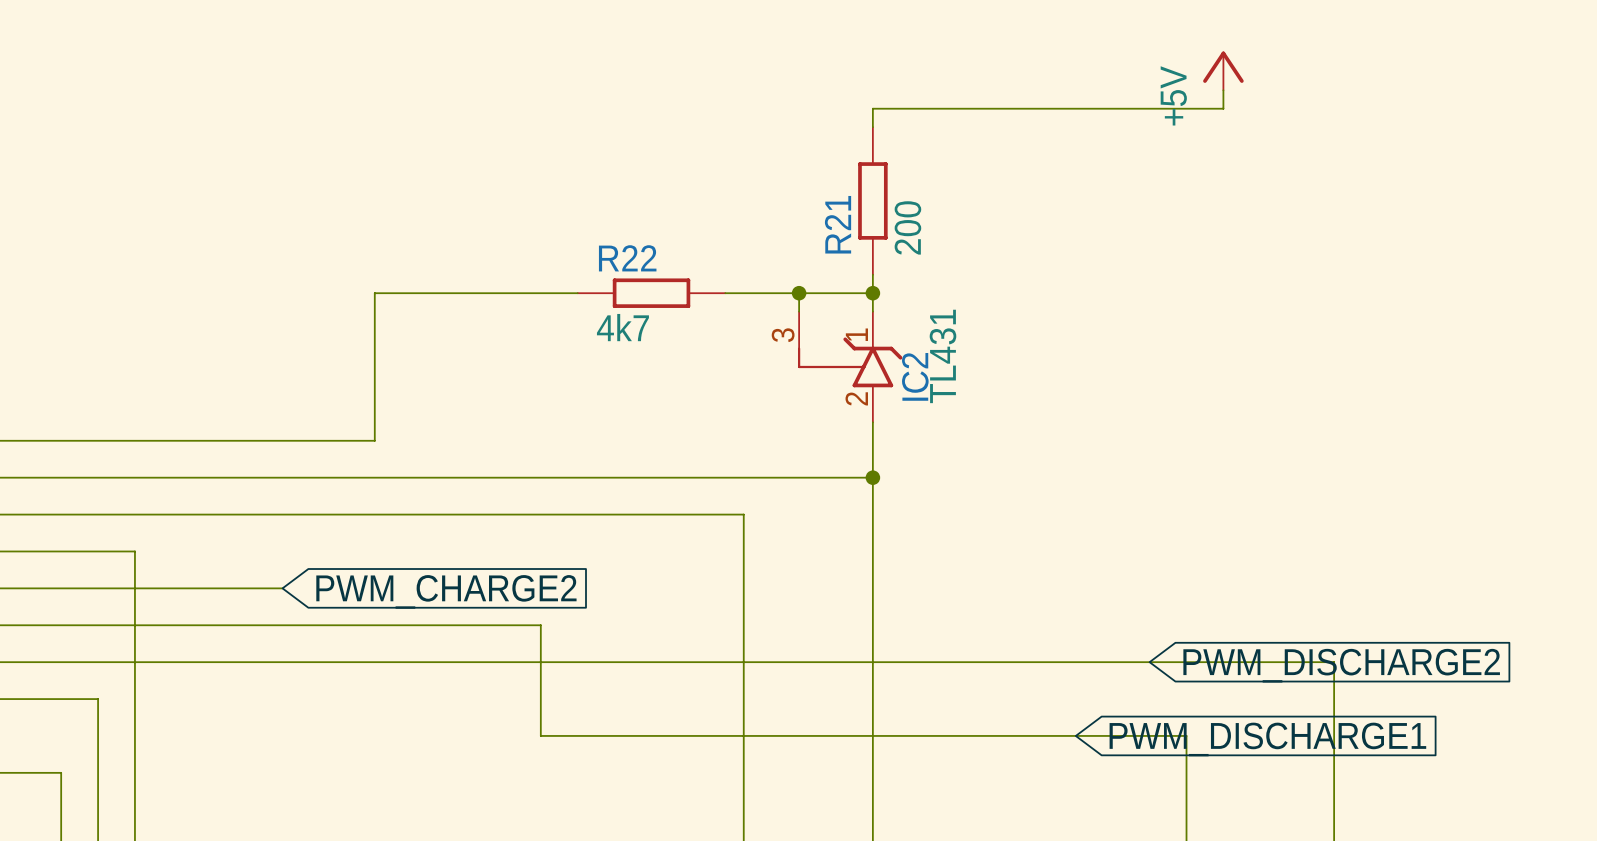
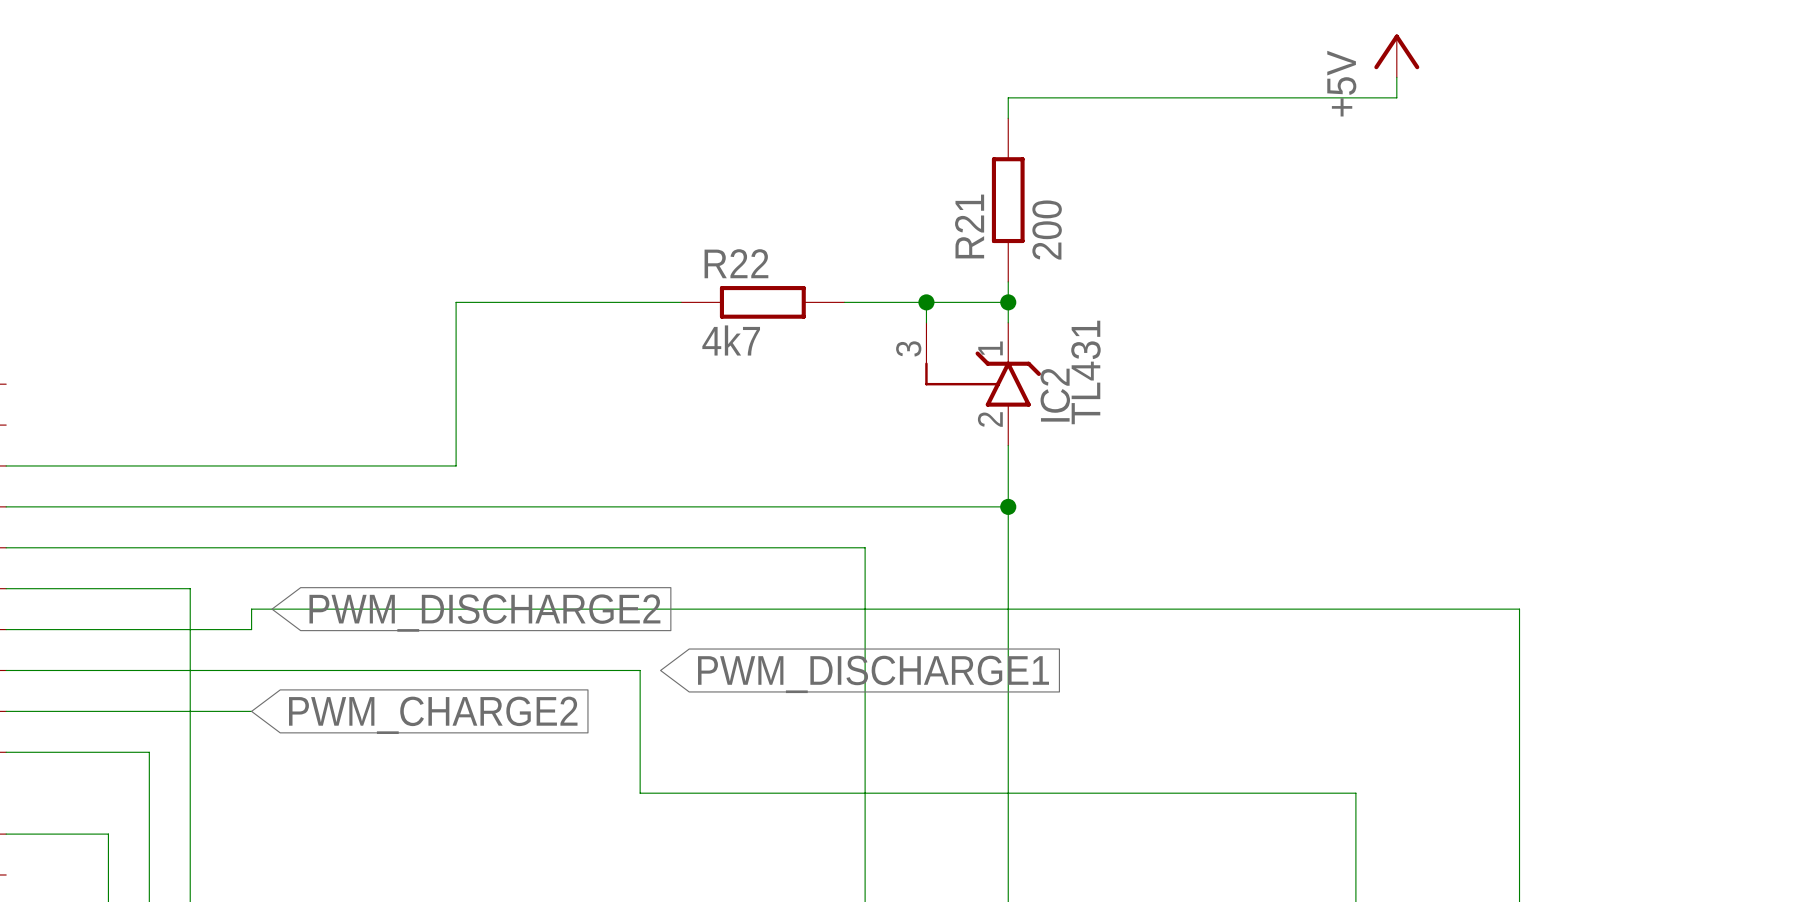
global label: none -> PWM_DISCHARGE2 (484, 613)
wire: (190, 588) (282, 588) -> none
global label position: PWM_CHARGE2 (446, 591) -> PWM_CHARGE2 (433, 715)
global label: none -> PWM_DISCHARGE1 (873, 674)
wire: (190, 662) (1334, 662) -> (251, 629) (251, 609) (1519, 609) (1519, 711)
global label: PWM_DISCHARGE2 (1341, 665) -> none
global label: PWM_DISCHARGE1 (1267, 739) -> none

